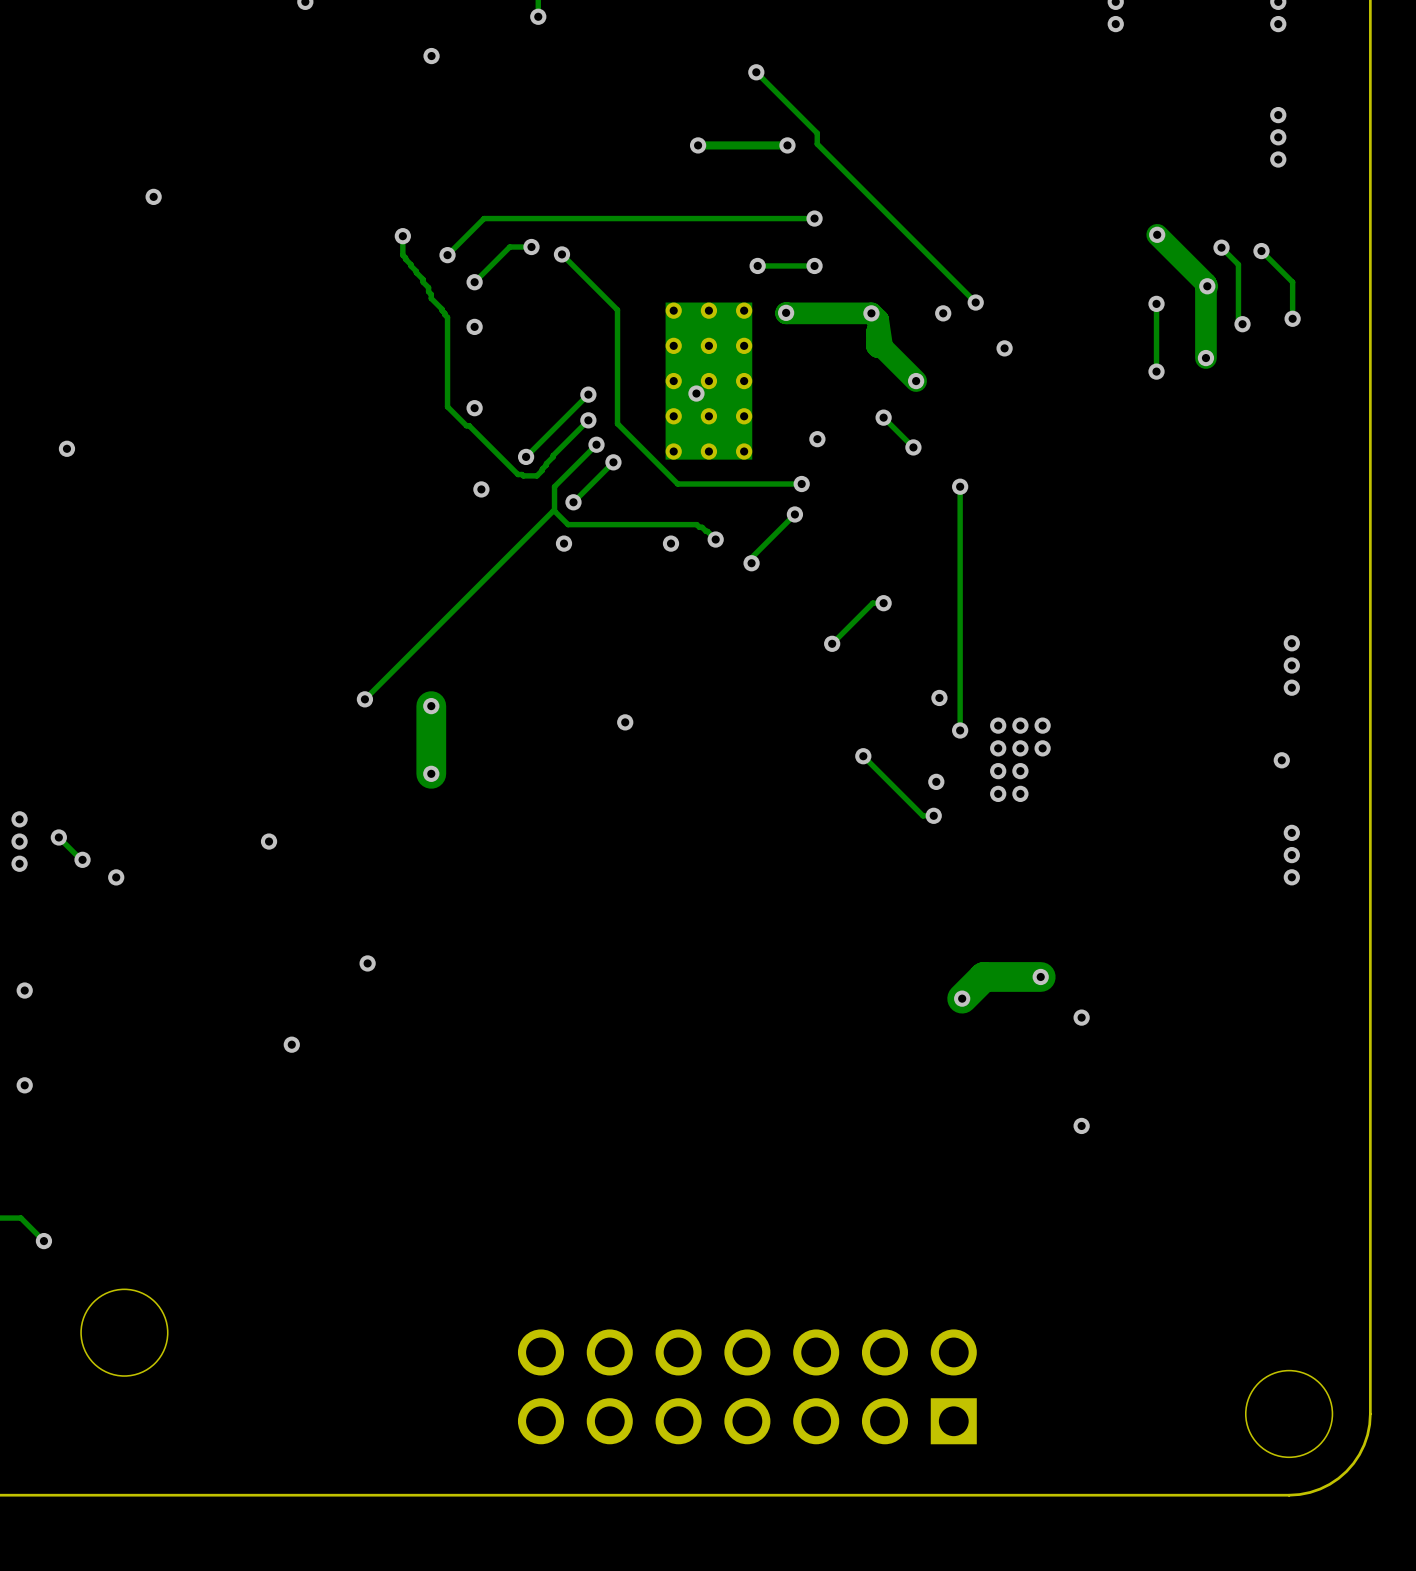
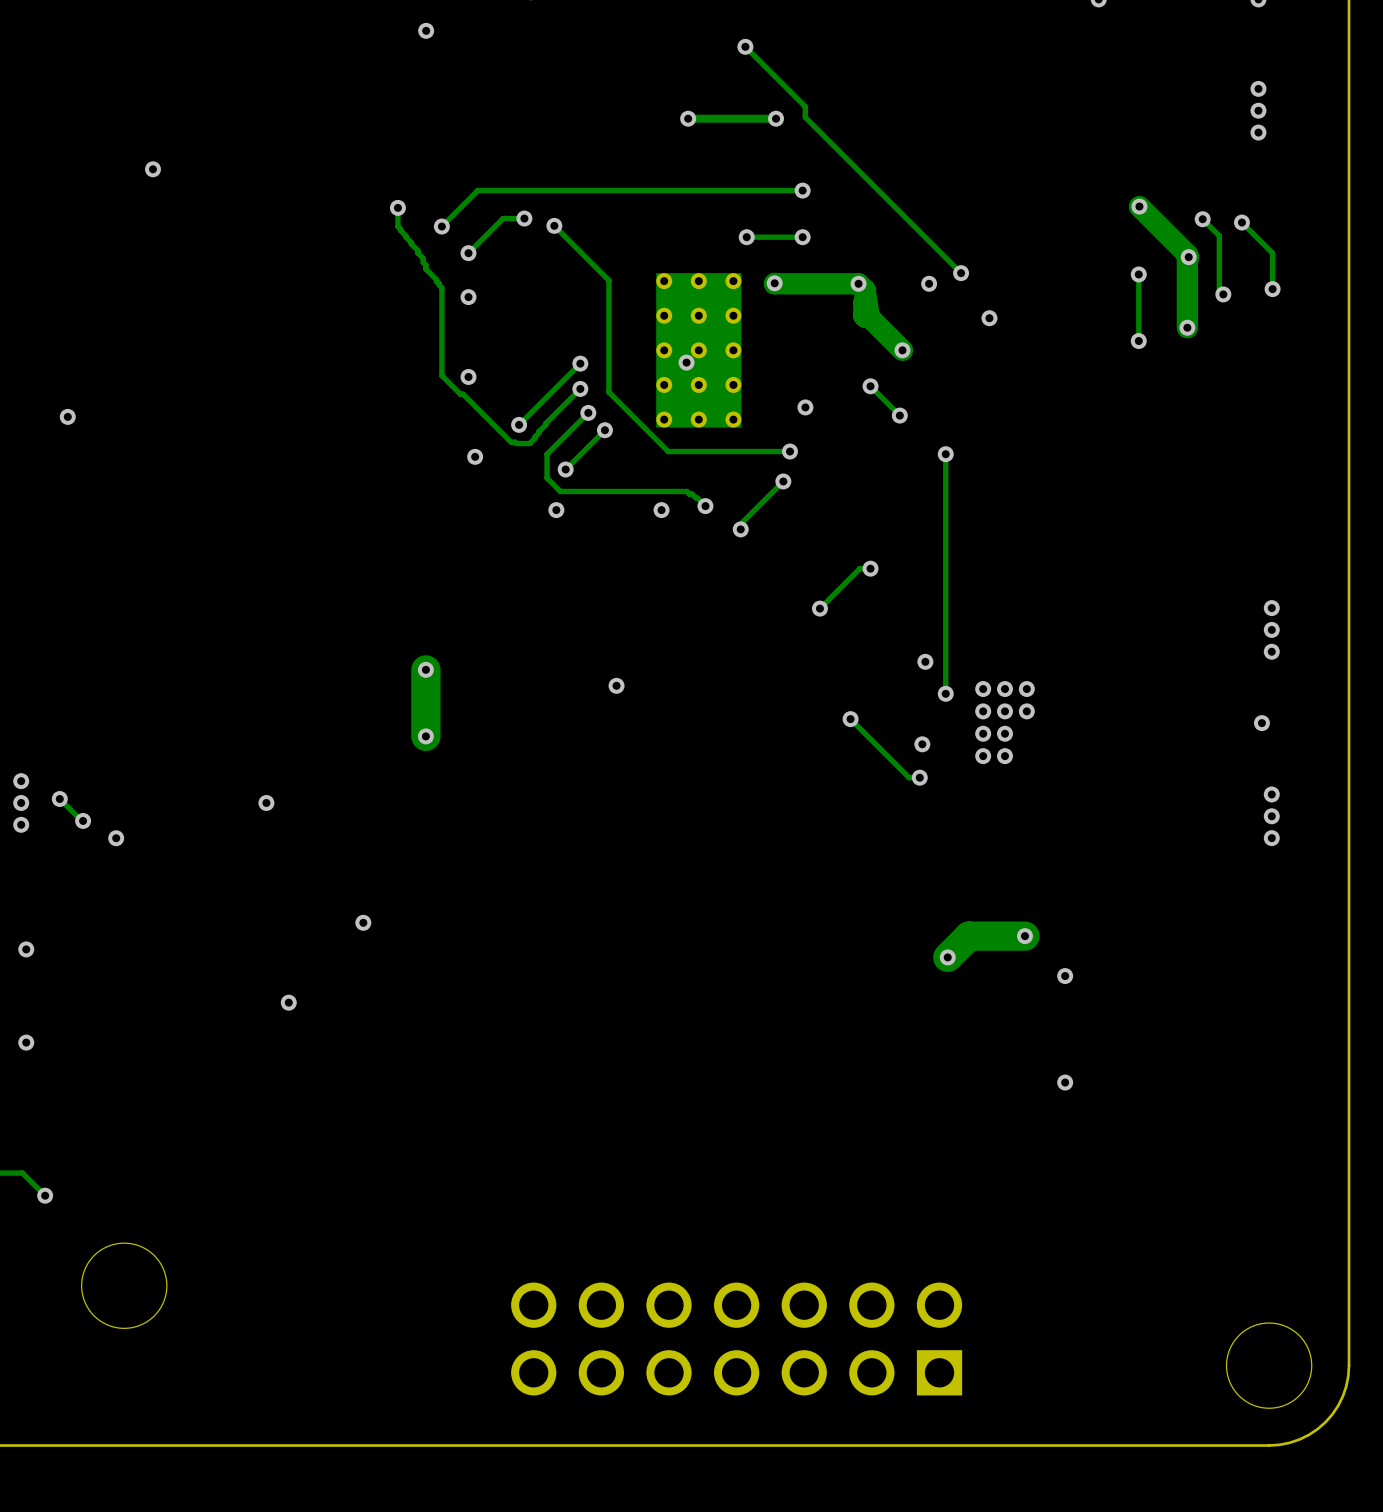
track: (554, 511) (364, 699) -> none
via: (364, 699) -> none

